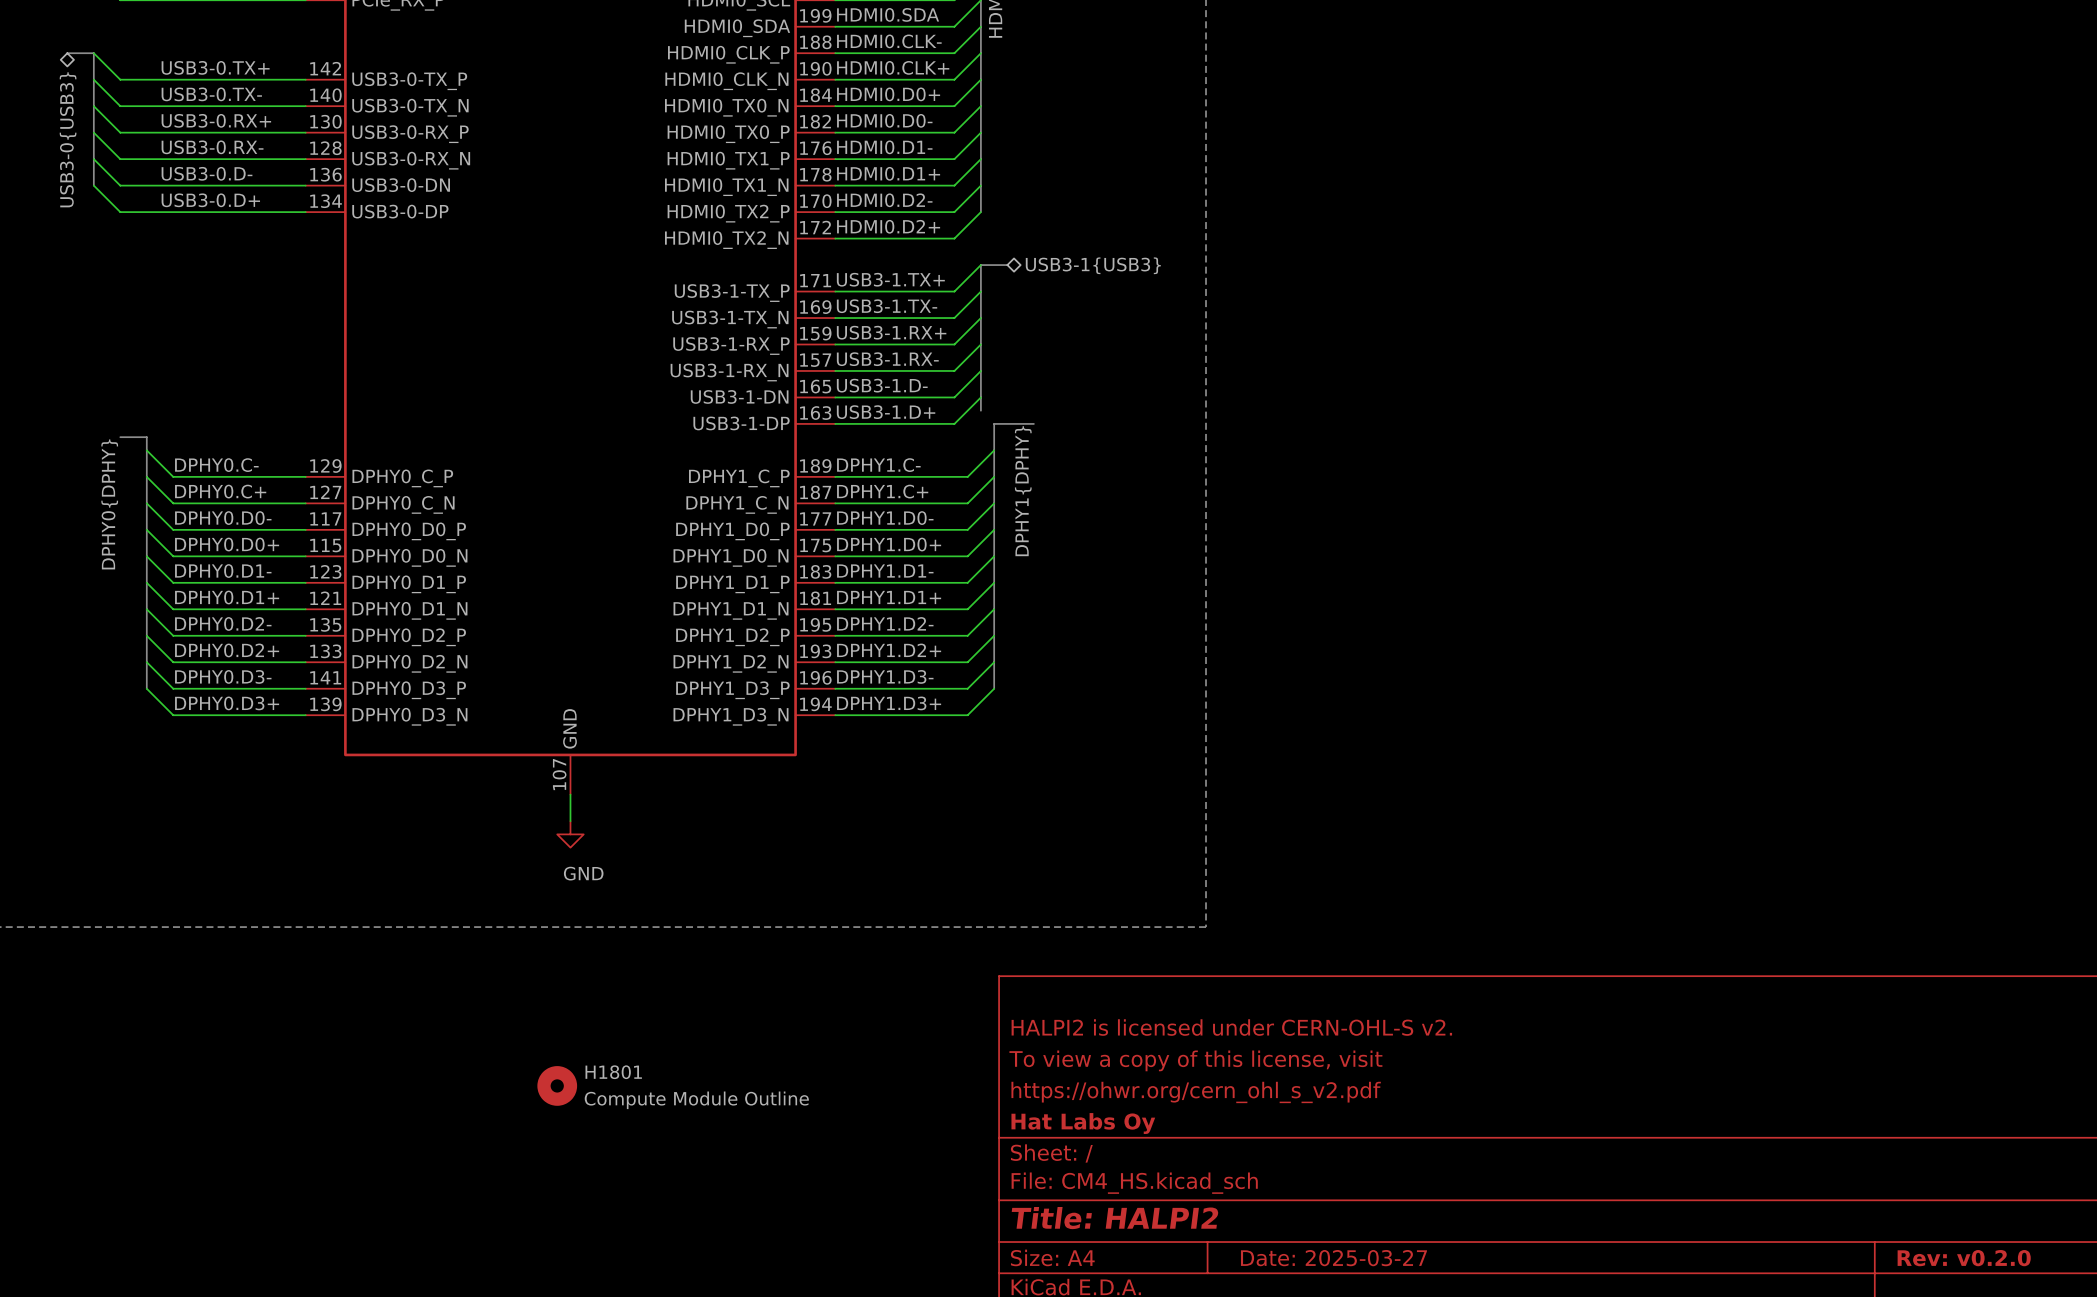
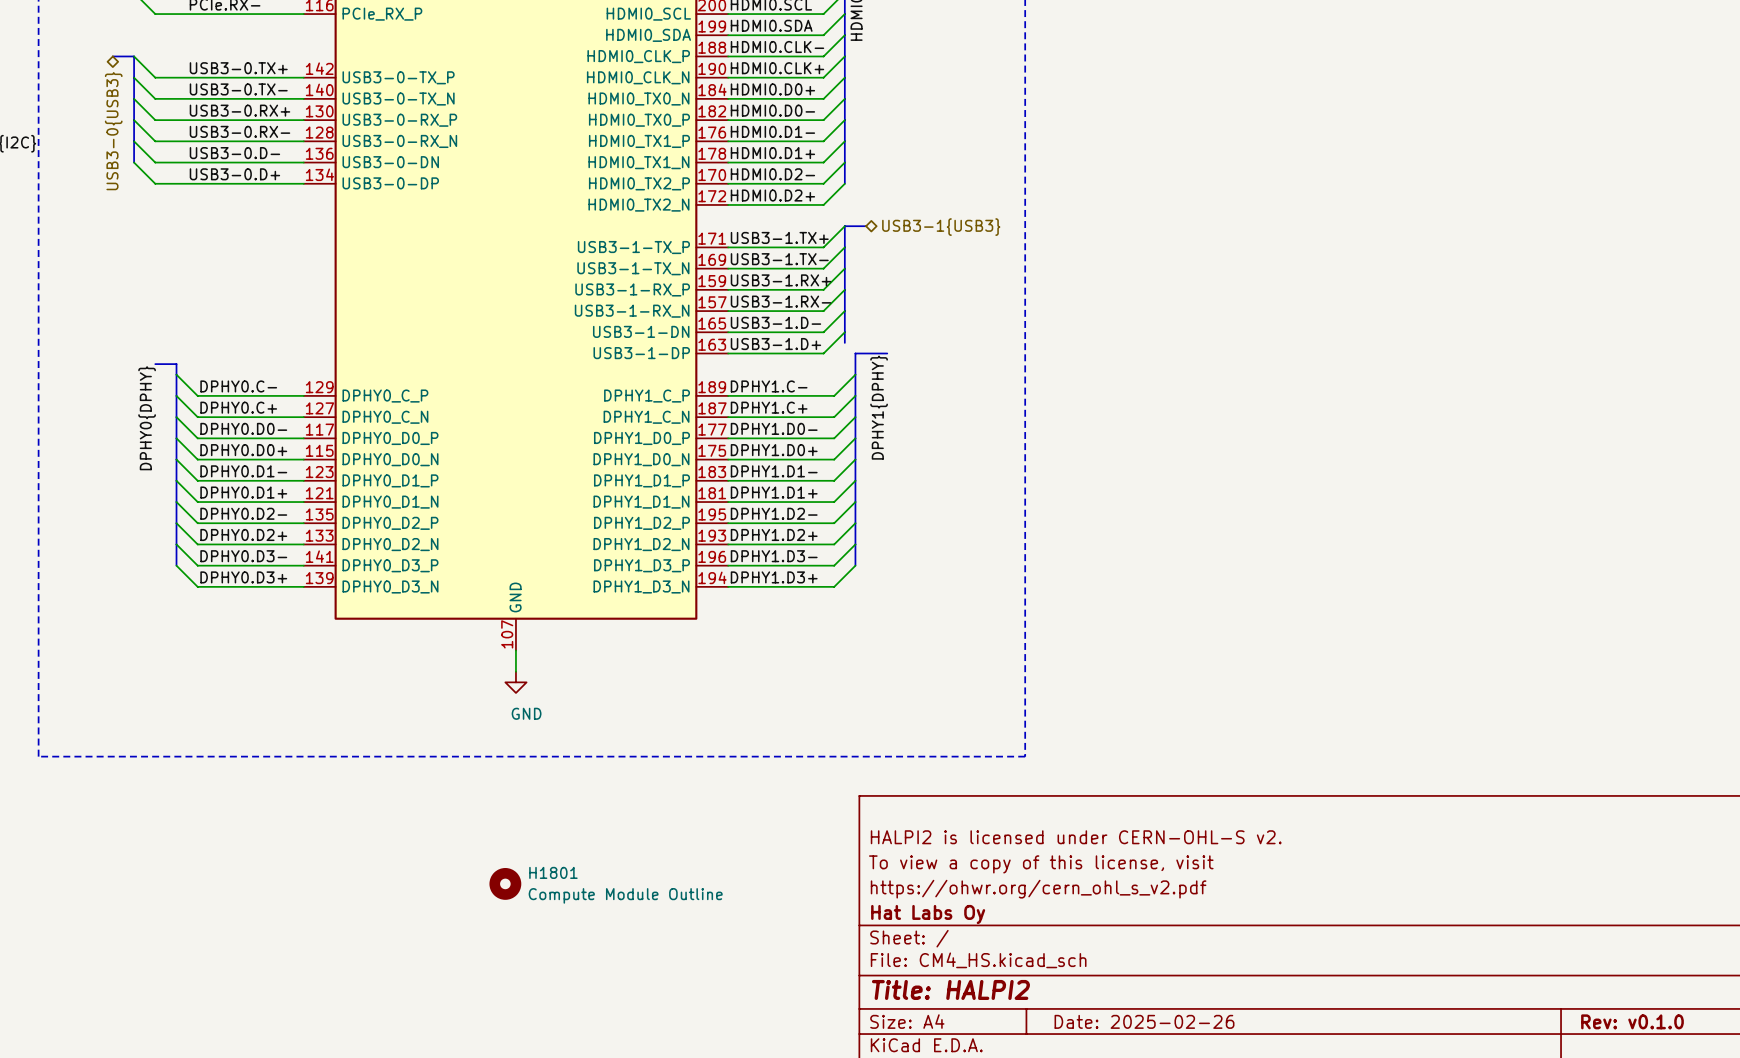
title block: Date: 2025-03-27 (1333, 1258) -> Date: 2025-02-26 (1144, 1021)
title block: Rev: v0.2.0 (1964, 1258) -> Rev: v0.1.0 (1632, 1021)

